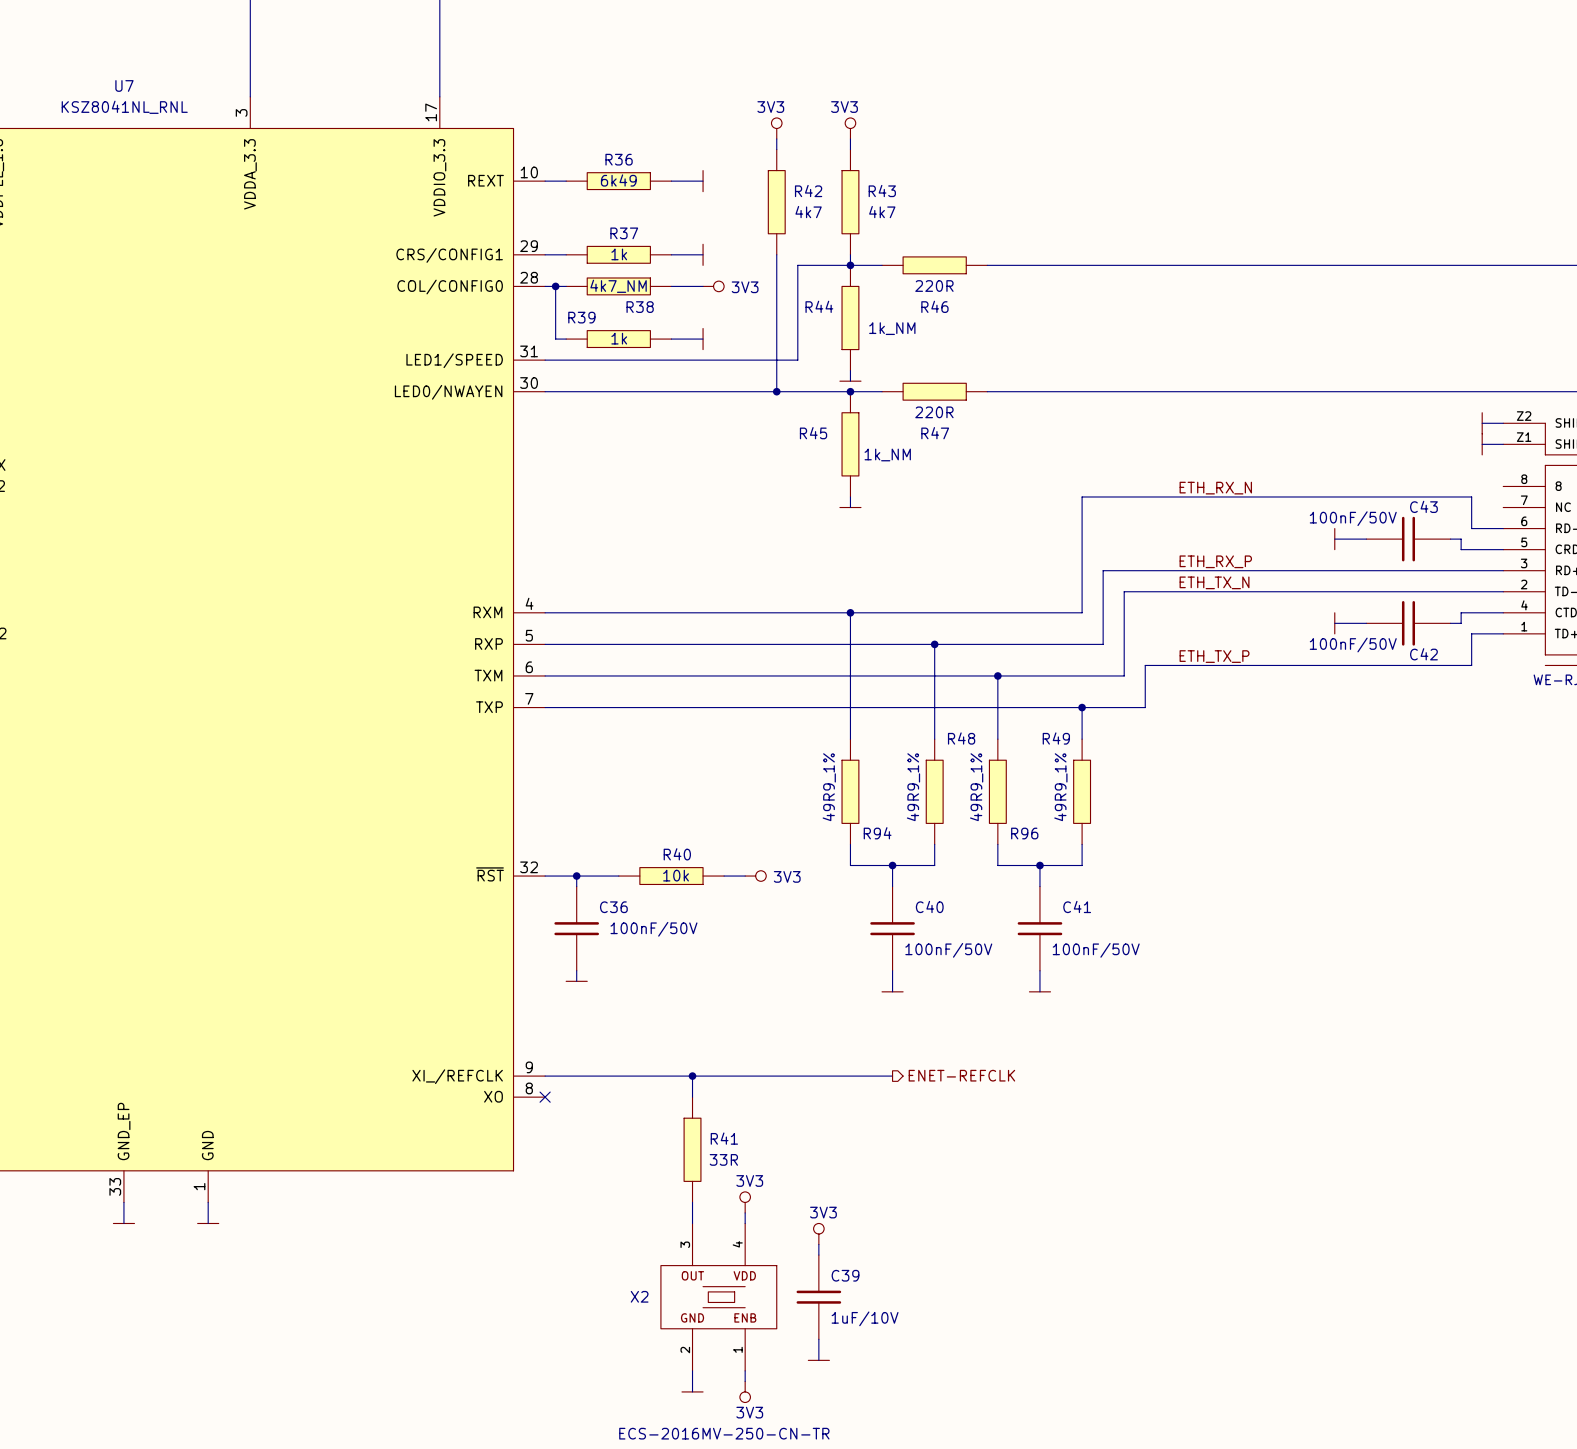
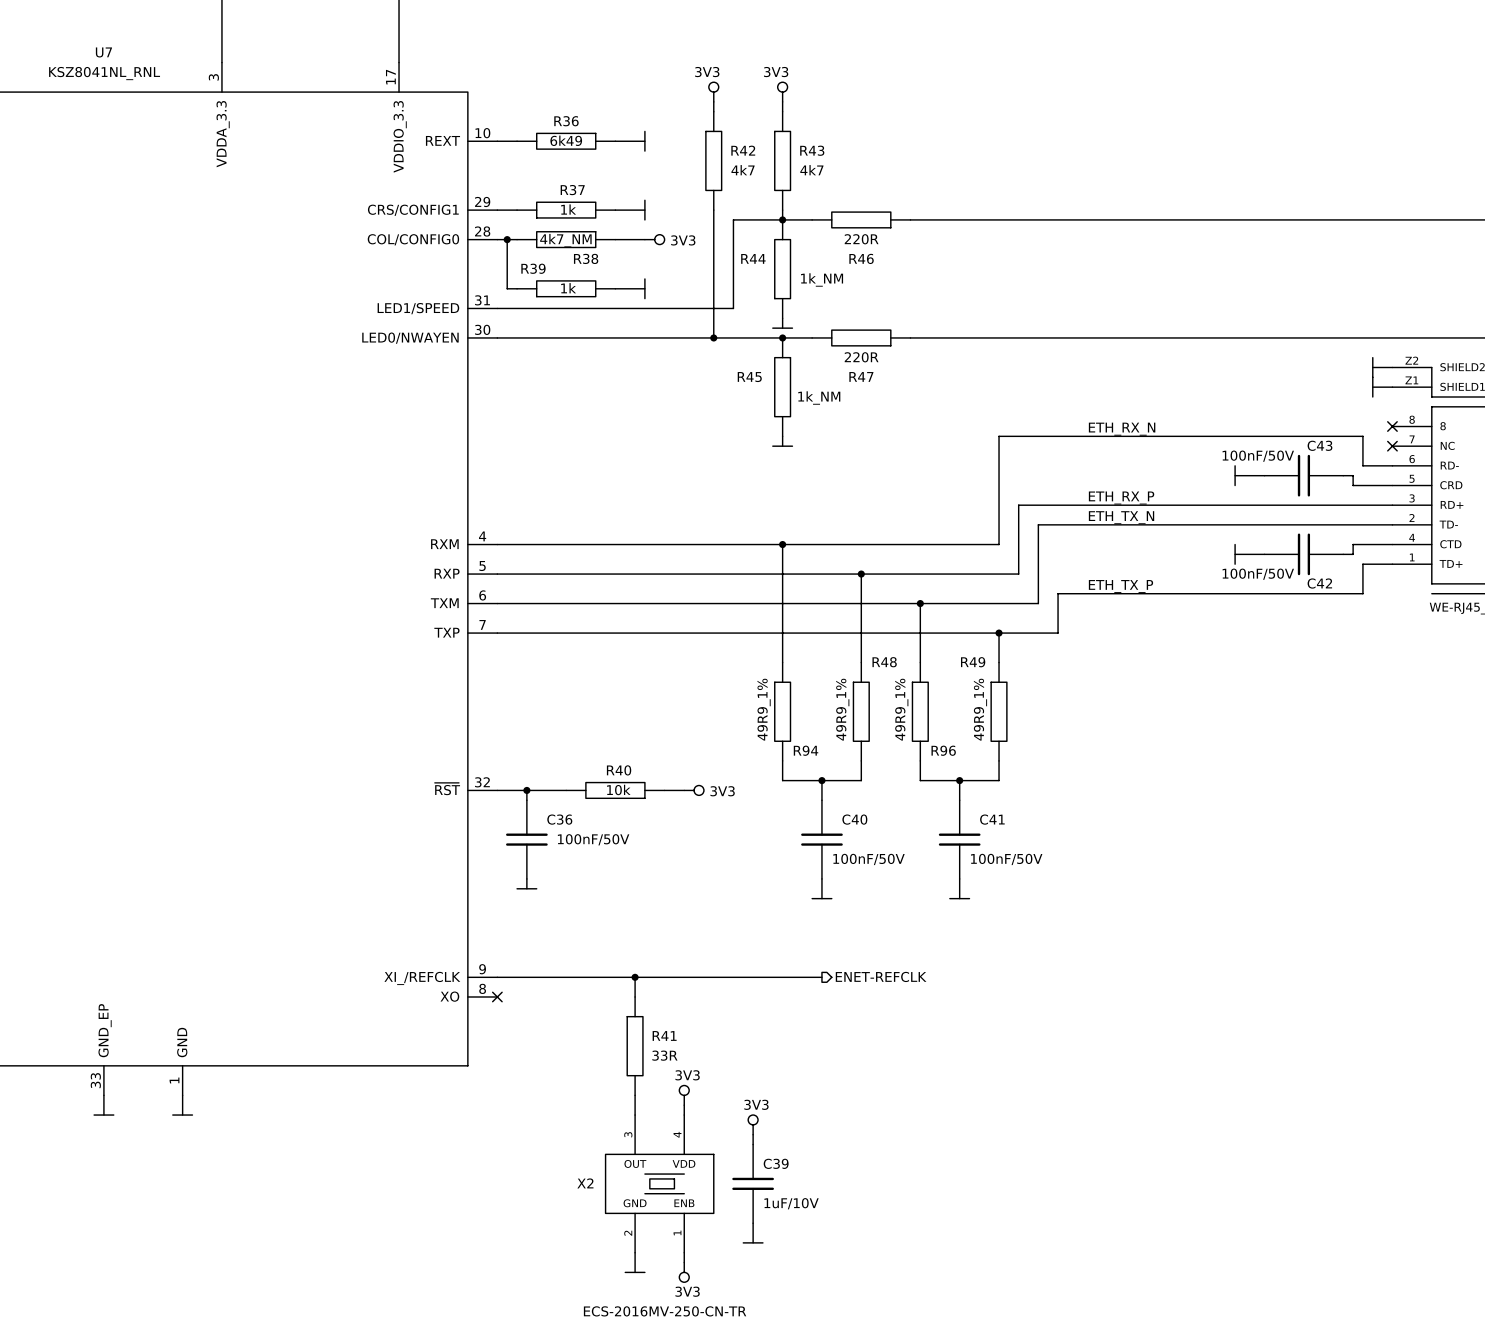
no-connect mark: none -> (1392, 426)
no-connect mark: none -> (1392, 446)

